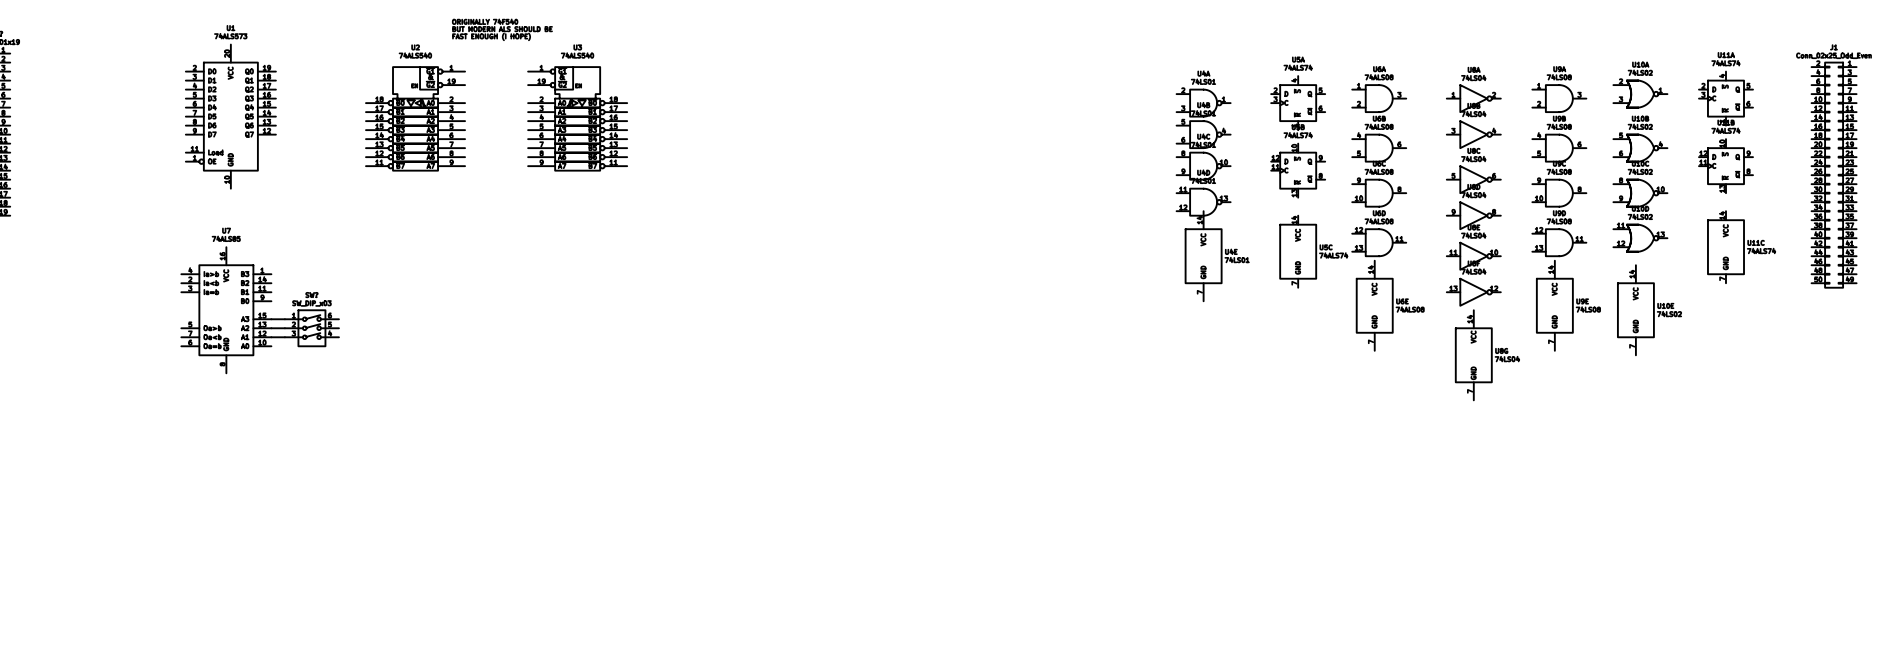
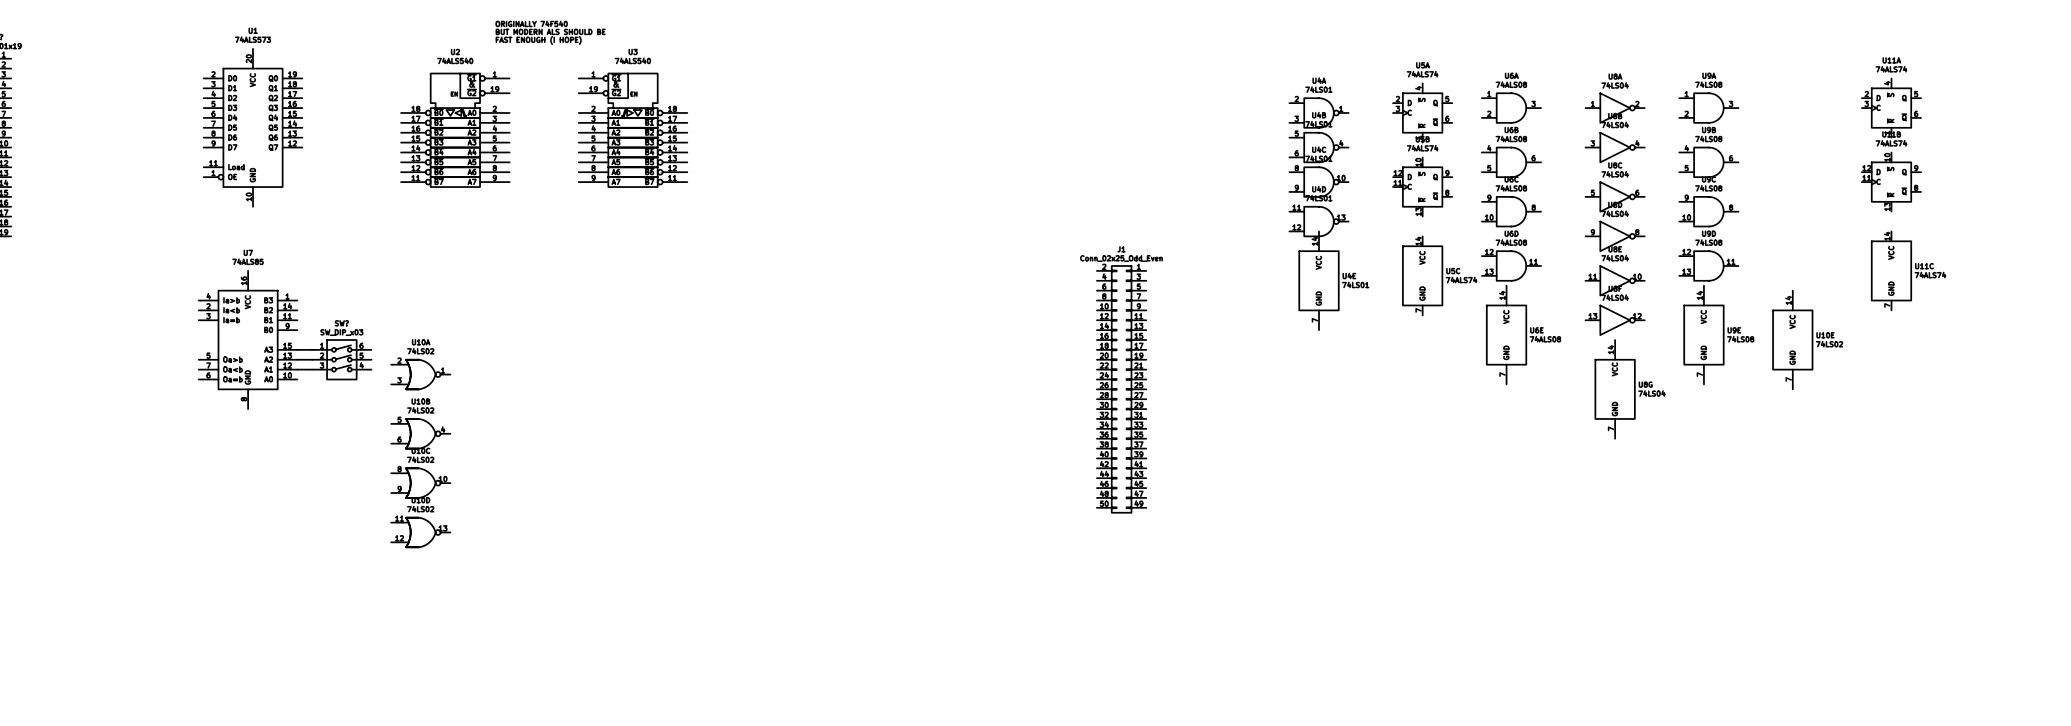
part position: (1640, 94) -> (420, 374)
part position: (1640, 148) -> (420, 433)
part position: (1834, 175) -> (1121, 389)
part position: (1640, 193) -> (420, 483)
part position: (1640, 238) -> (420, 532)

